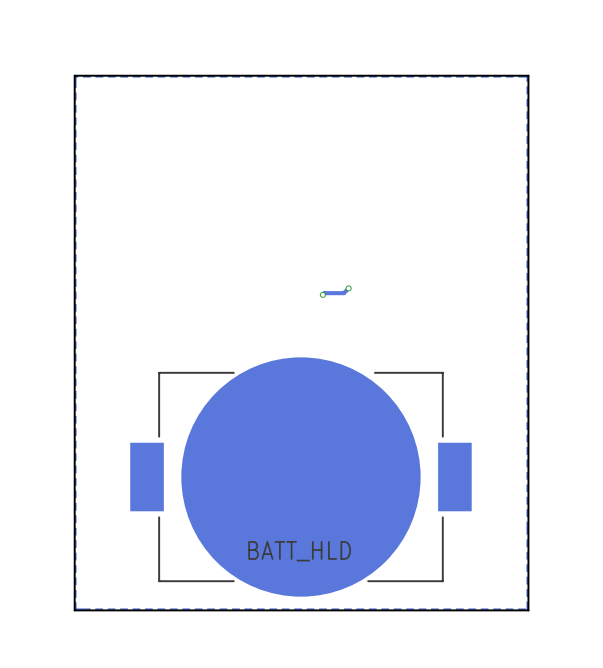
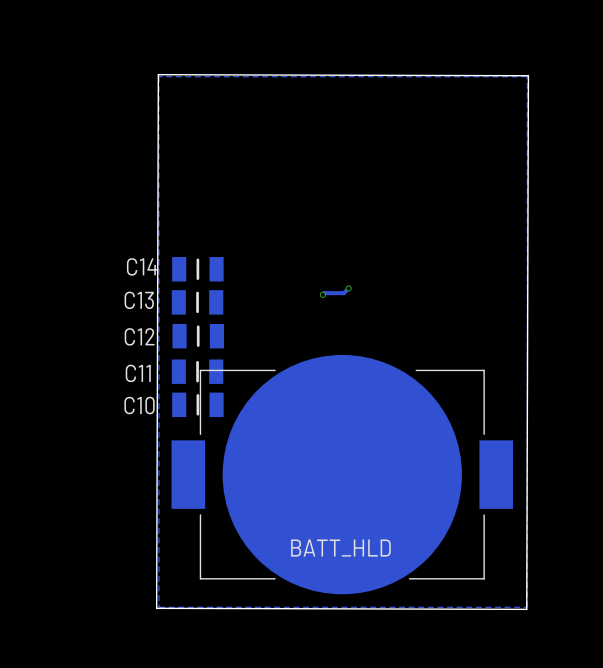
board edge: (528, 75) (74, 75) (74, 610) (528, 610) (528, 75) -> (158, 74) (528, 75) (526, 609) (156, 608) (158, 74)
zone outline: (158, 76) (75, 76) (75, 609) (527, 609) (527, 607) -> (158, 76) (158, 607) (527, 607)
C14: none -> (197, 269)
C13: none -> (197, 302)
C12: none -> (198, 336)
C11: none -> (197, 371)
C10: none -> (197, 404)
BATT_HLD position: (300, 477) -> (342, 474)

